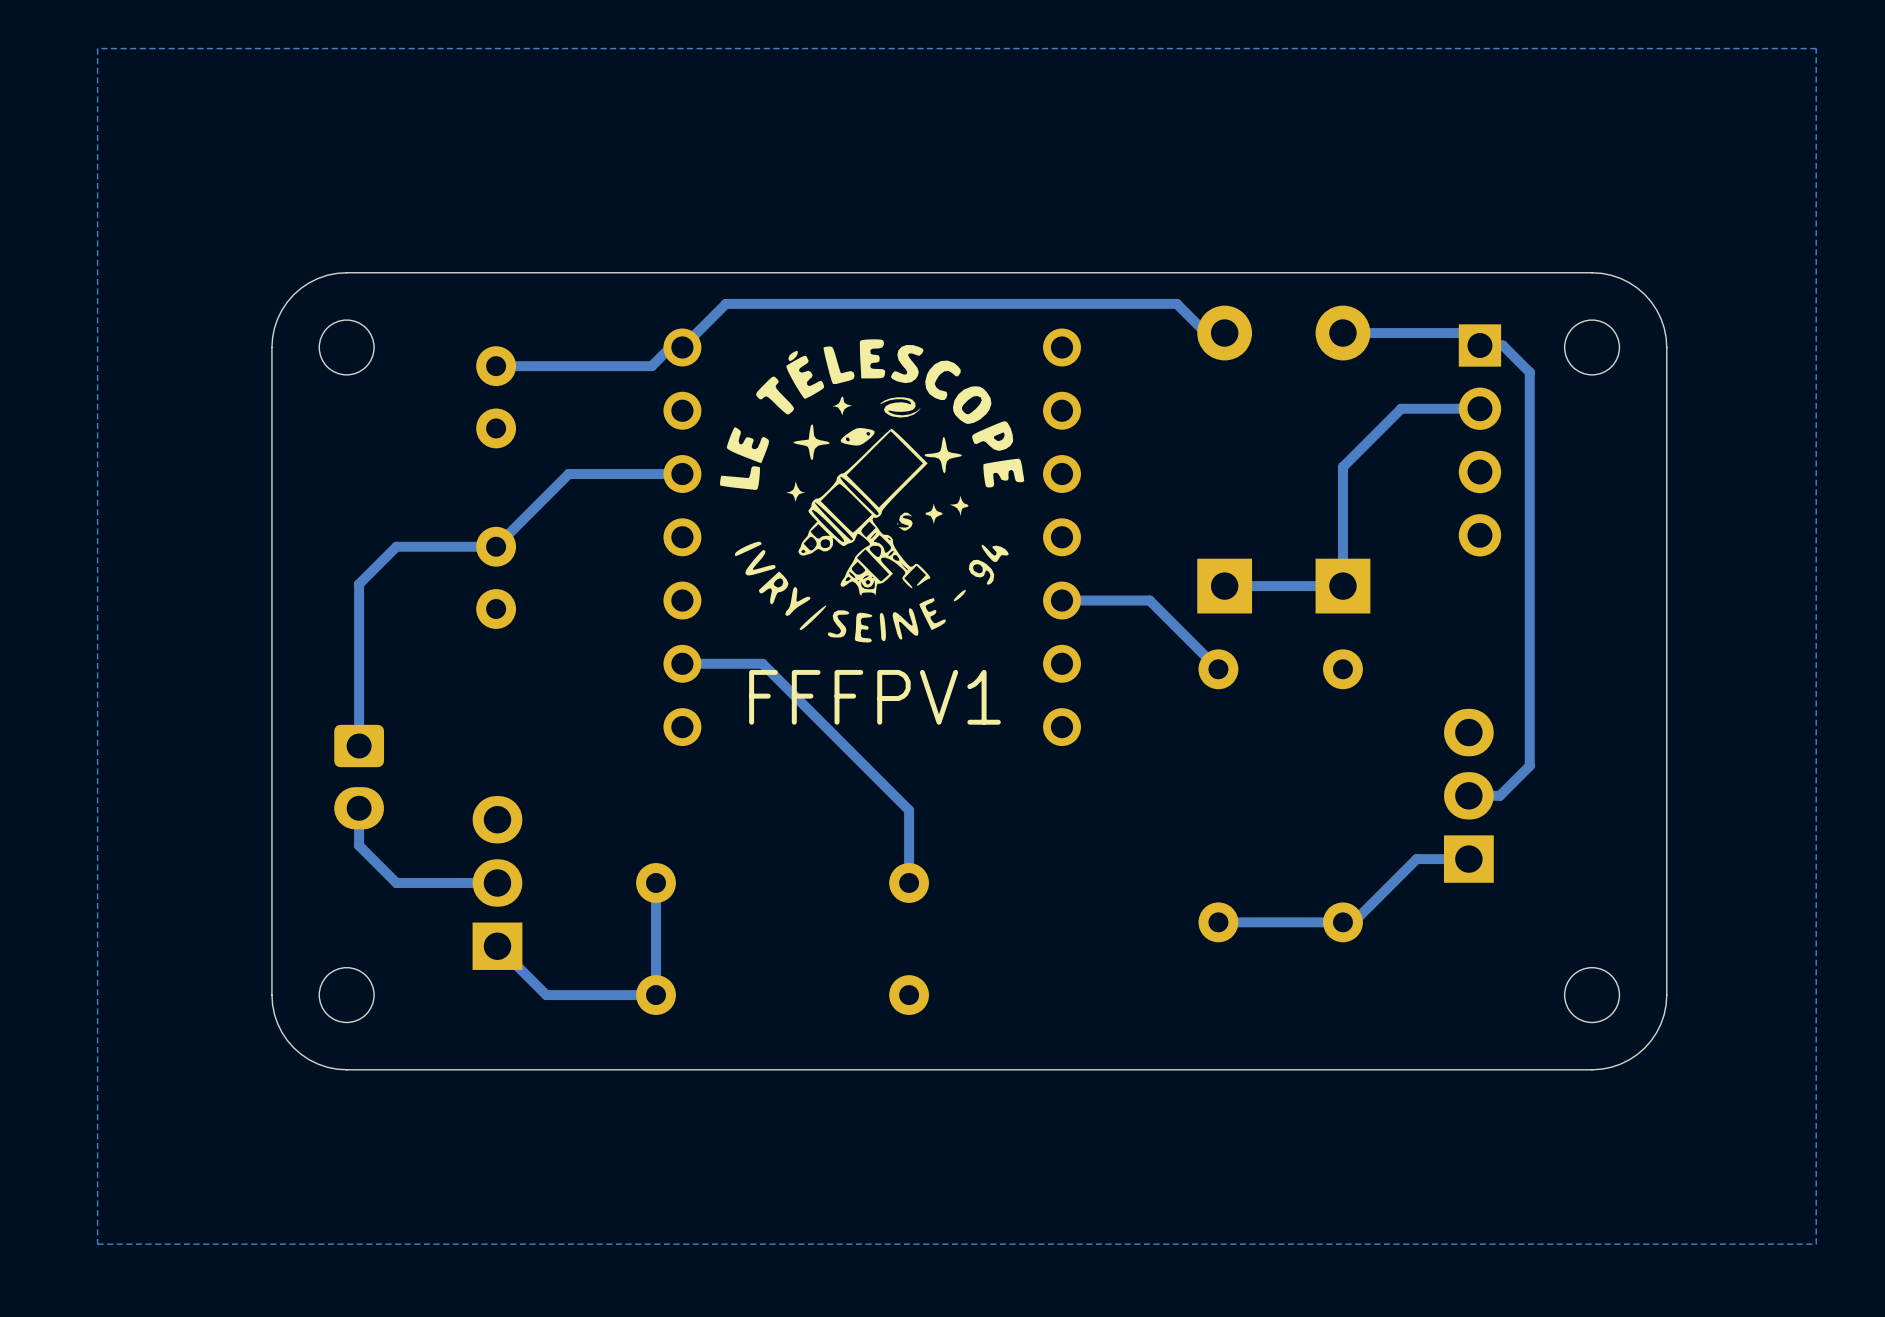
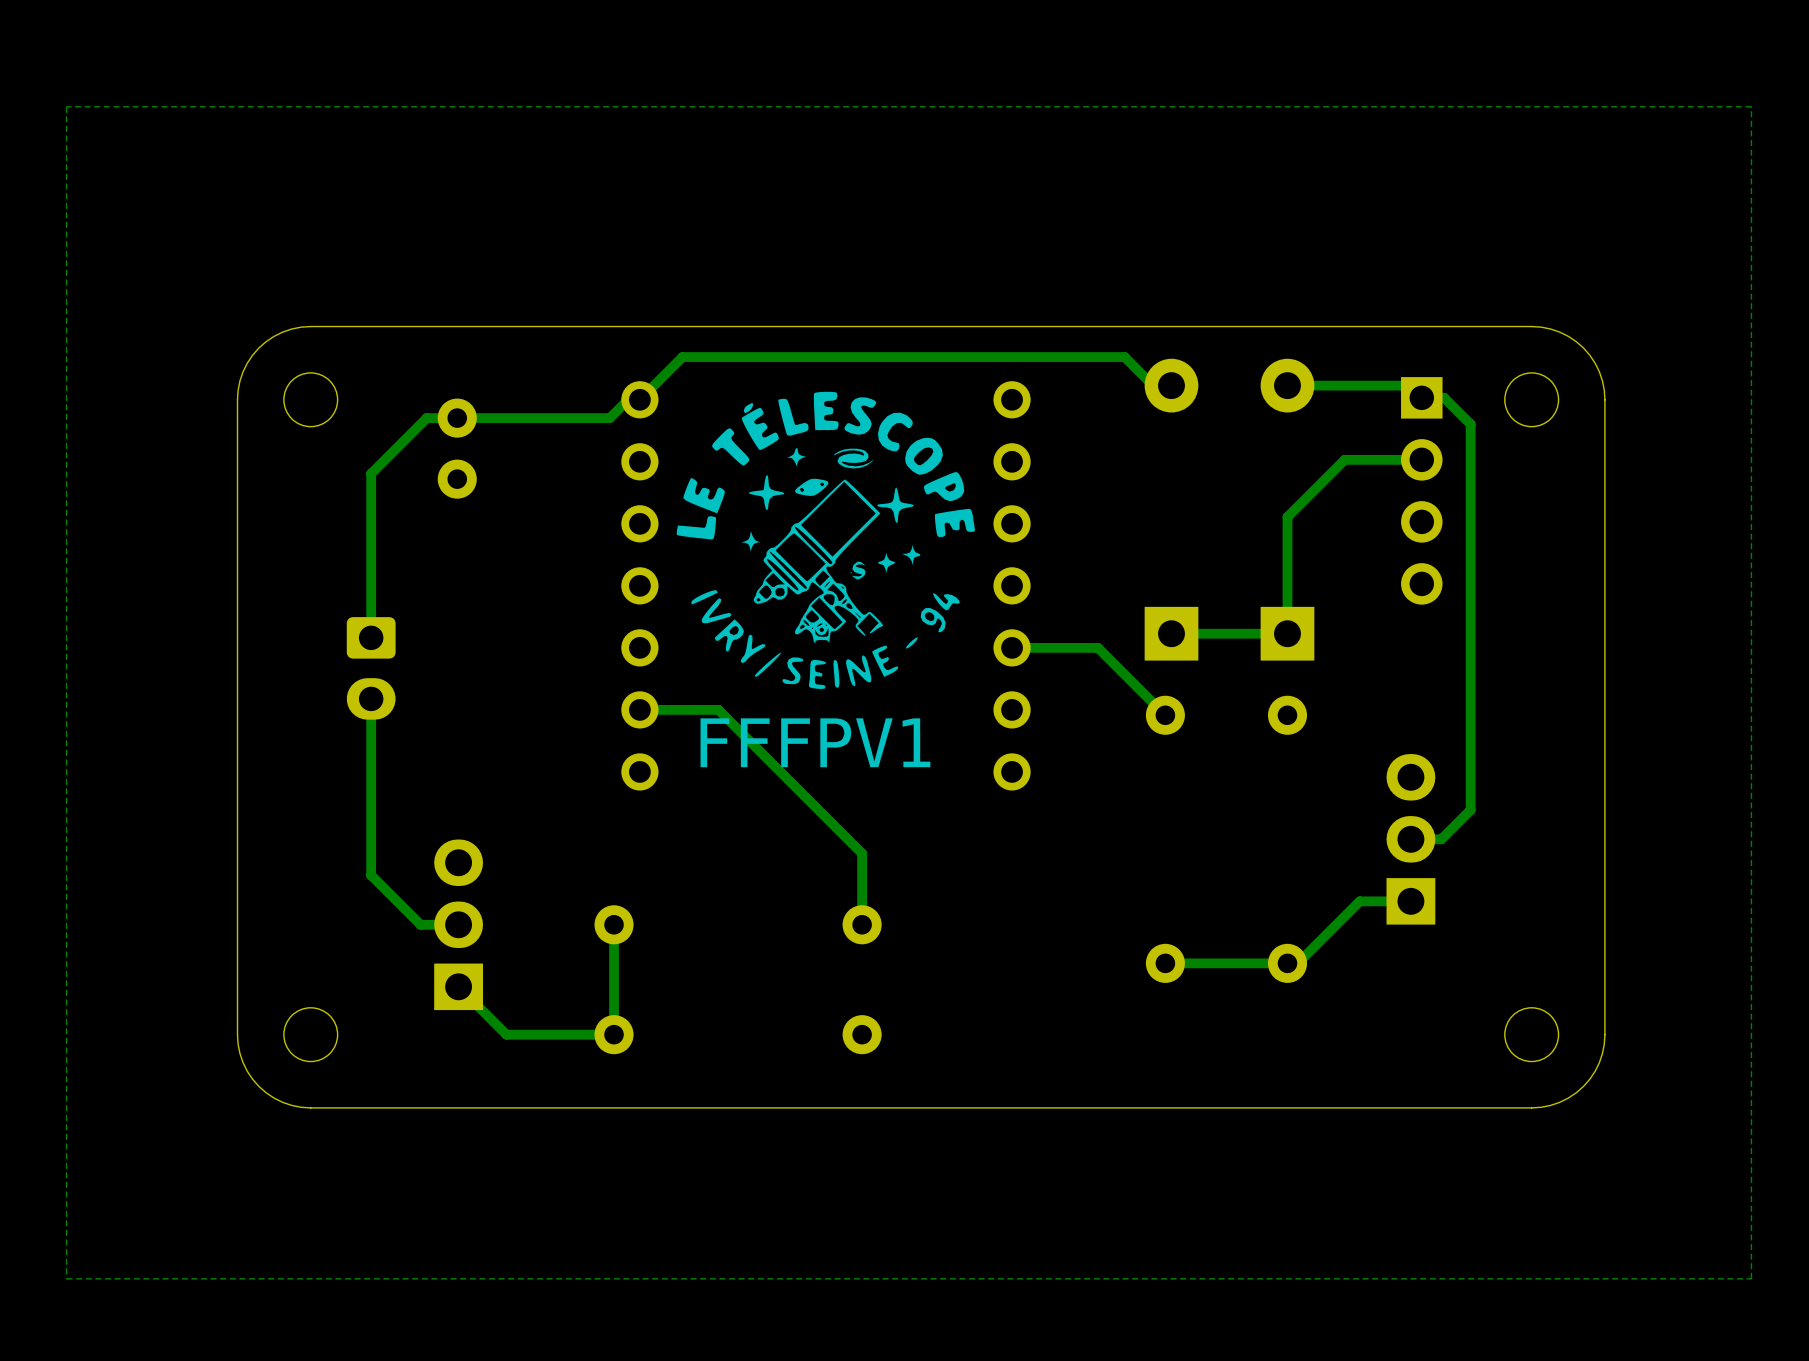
track: none -> (457, 418) (426, 418) (371, 473) (371, 637)
track: (682, 474) (568, 474) (496, 546) (396, 546) (359, 584) (359, 746) -> none
part: (496, 577) -> none
part position: (359, 777) -> (371, 668)
track: (359, 808) (359, 845) (396, 882) (458, 882) -> (371, 698) (371, 875) (420, 924)

